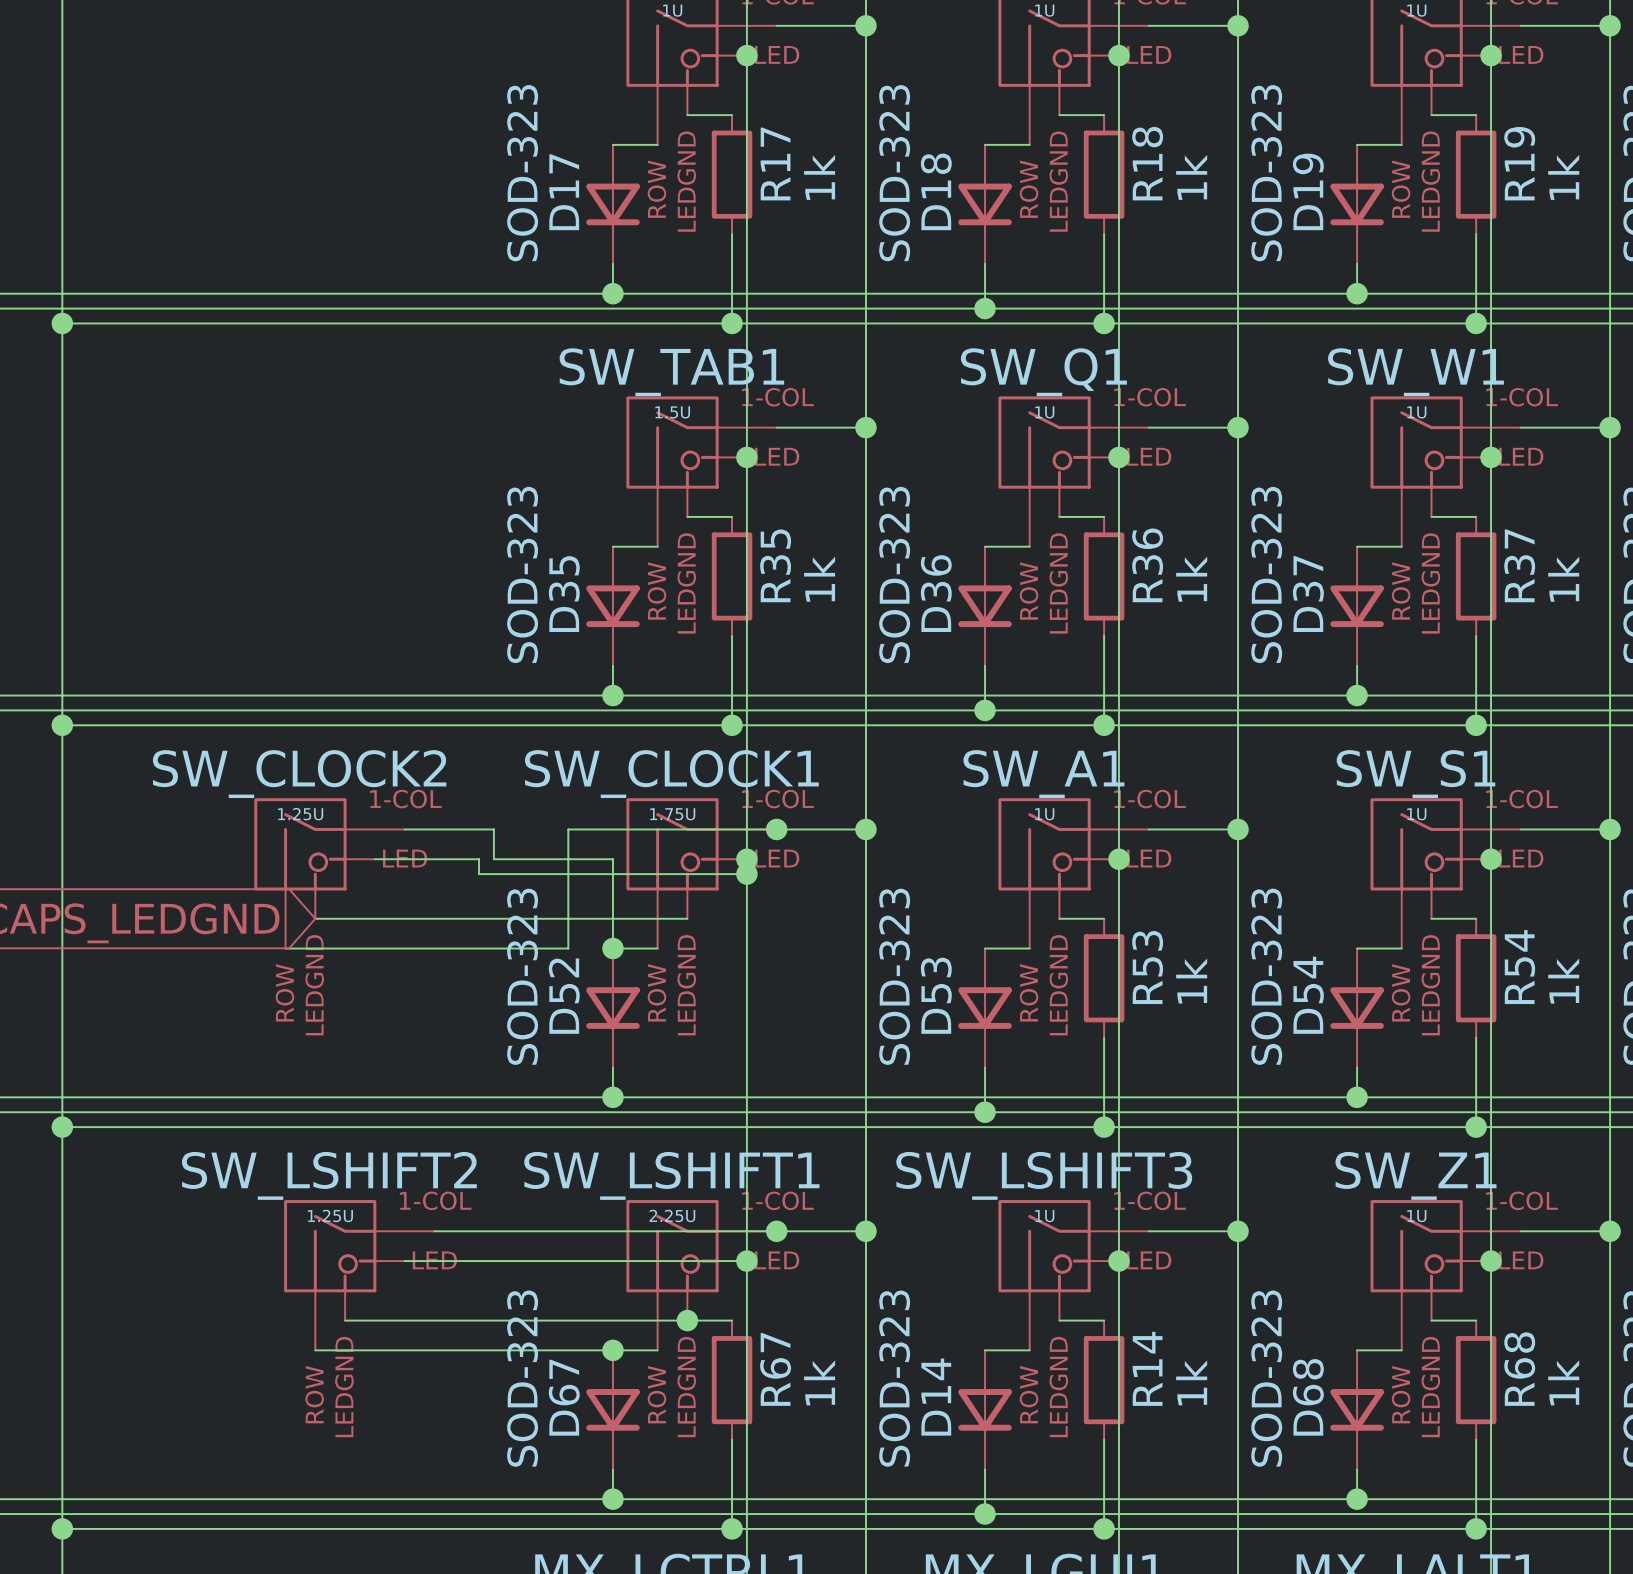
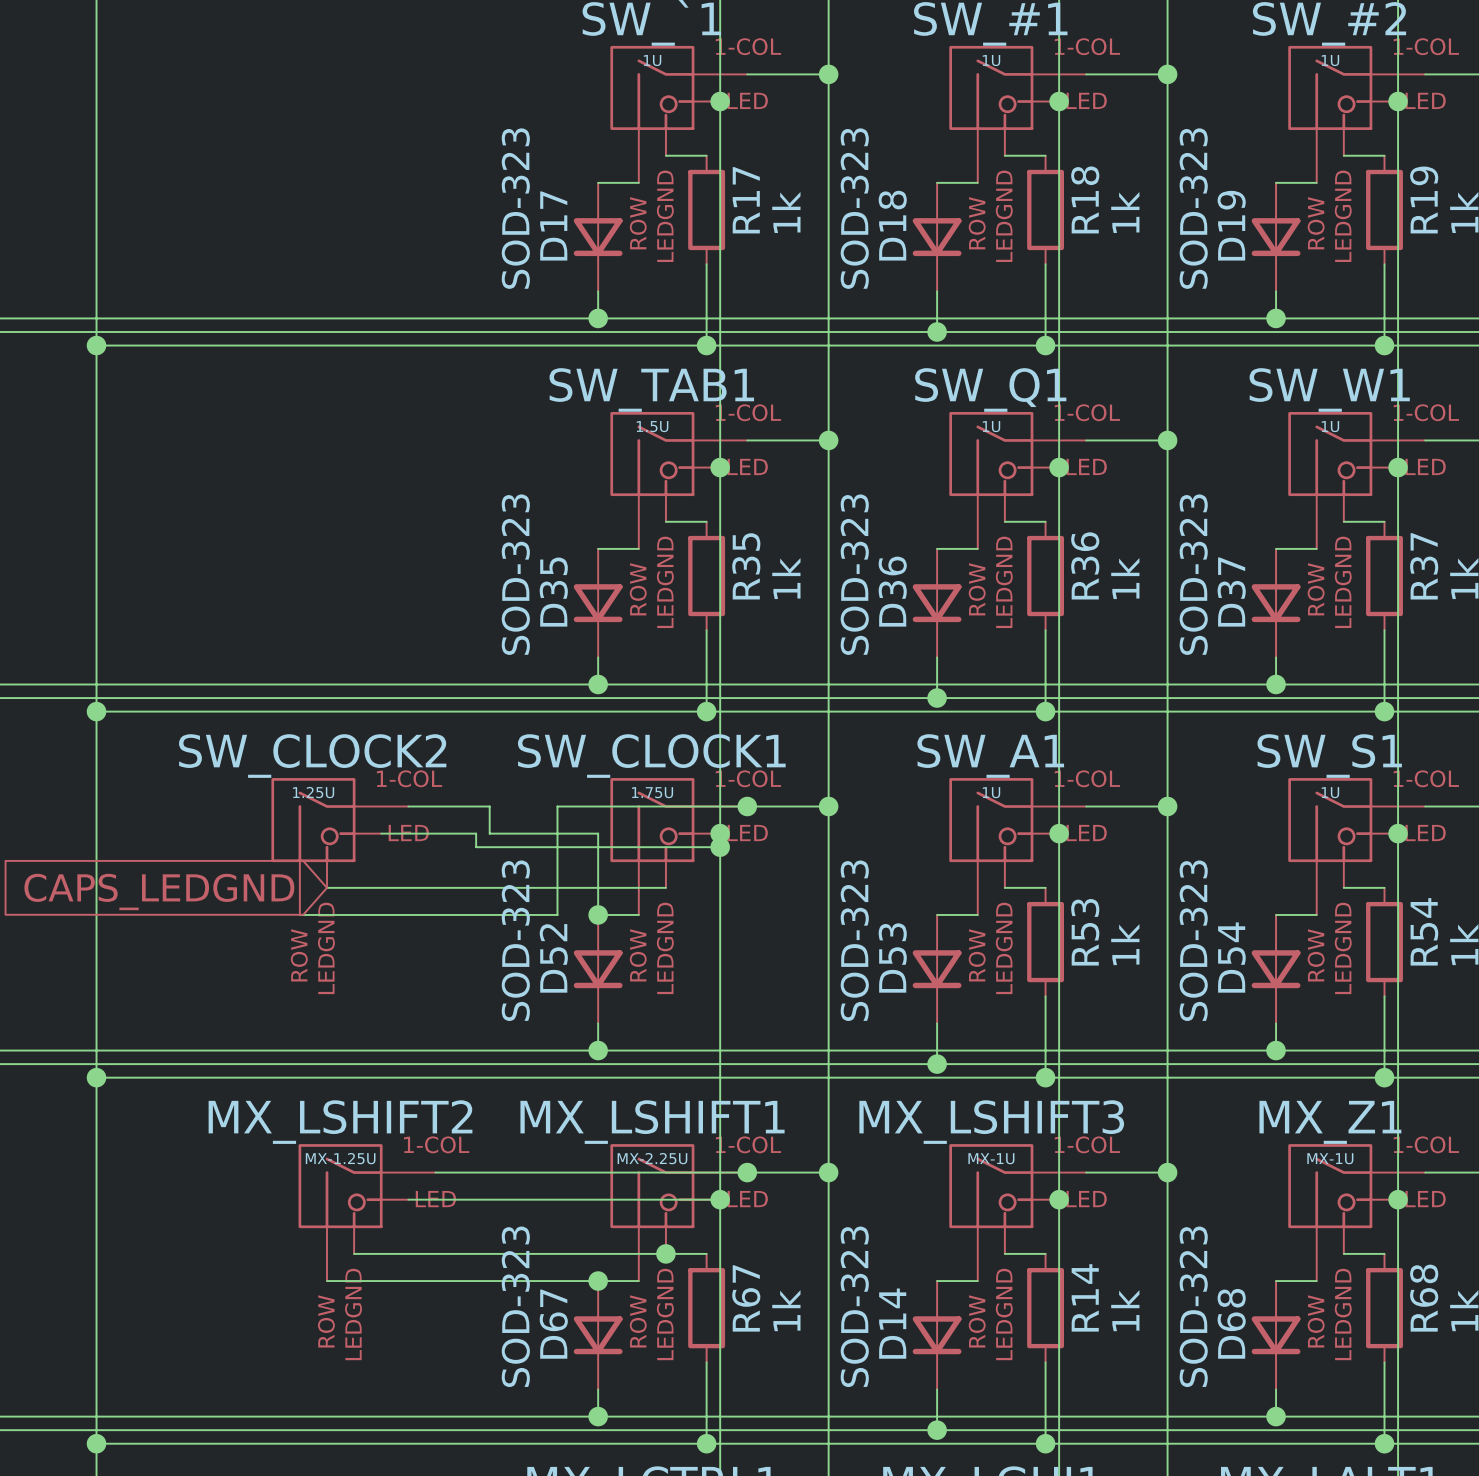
SW_LSHIFT2 name: SW_LSHIFT2 (329, 1175) -> MX_LSHIFT2 (340, 1122)
SW_LSHIFT1 name: SW_LSHIFT1 (671, 1175) -> MX_LSHIFT1 (652, 1122)
SW_LSHIFT3 name: SW_LSHIFT3 (1044, 1175) -> MX_LSHIFT3 (991, 1122)
SW_Z1 name: SW_Z1 (1415, 1175) -> MX_Z1 (1330, 1122)
SW_LSHIFT2 value: 1.25U (330, 1215) -> MX-1.25U (340, 1158)
SW_LSHIFT1 value: 2.25U (672, 1215) -> MX-2.25U (652, 1158)
SW_LSHIFT3 value: 1U (1044, 1216) -> MX-1U (991, 1158)
SW_Z1 value: 1U (1416, 1216) -> MX-1U (1330, 1158)

